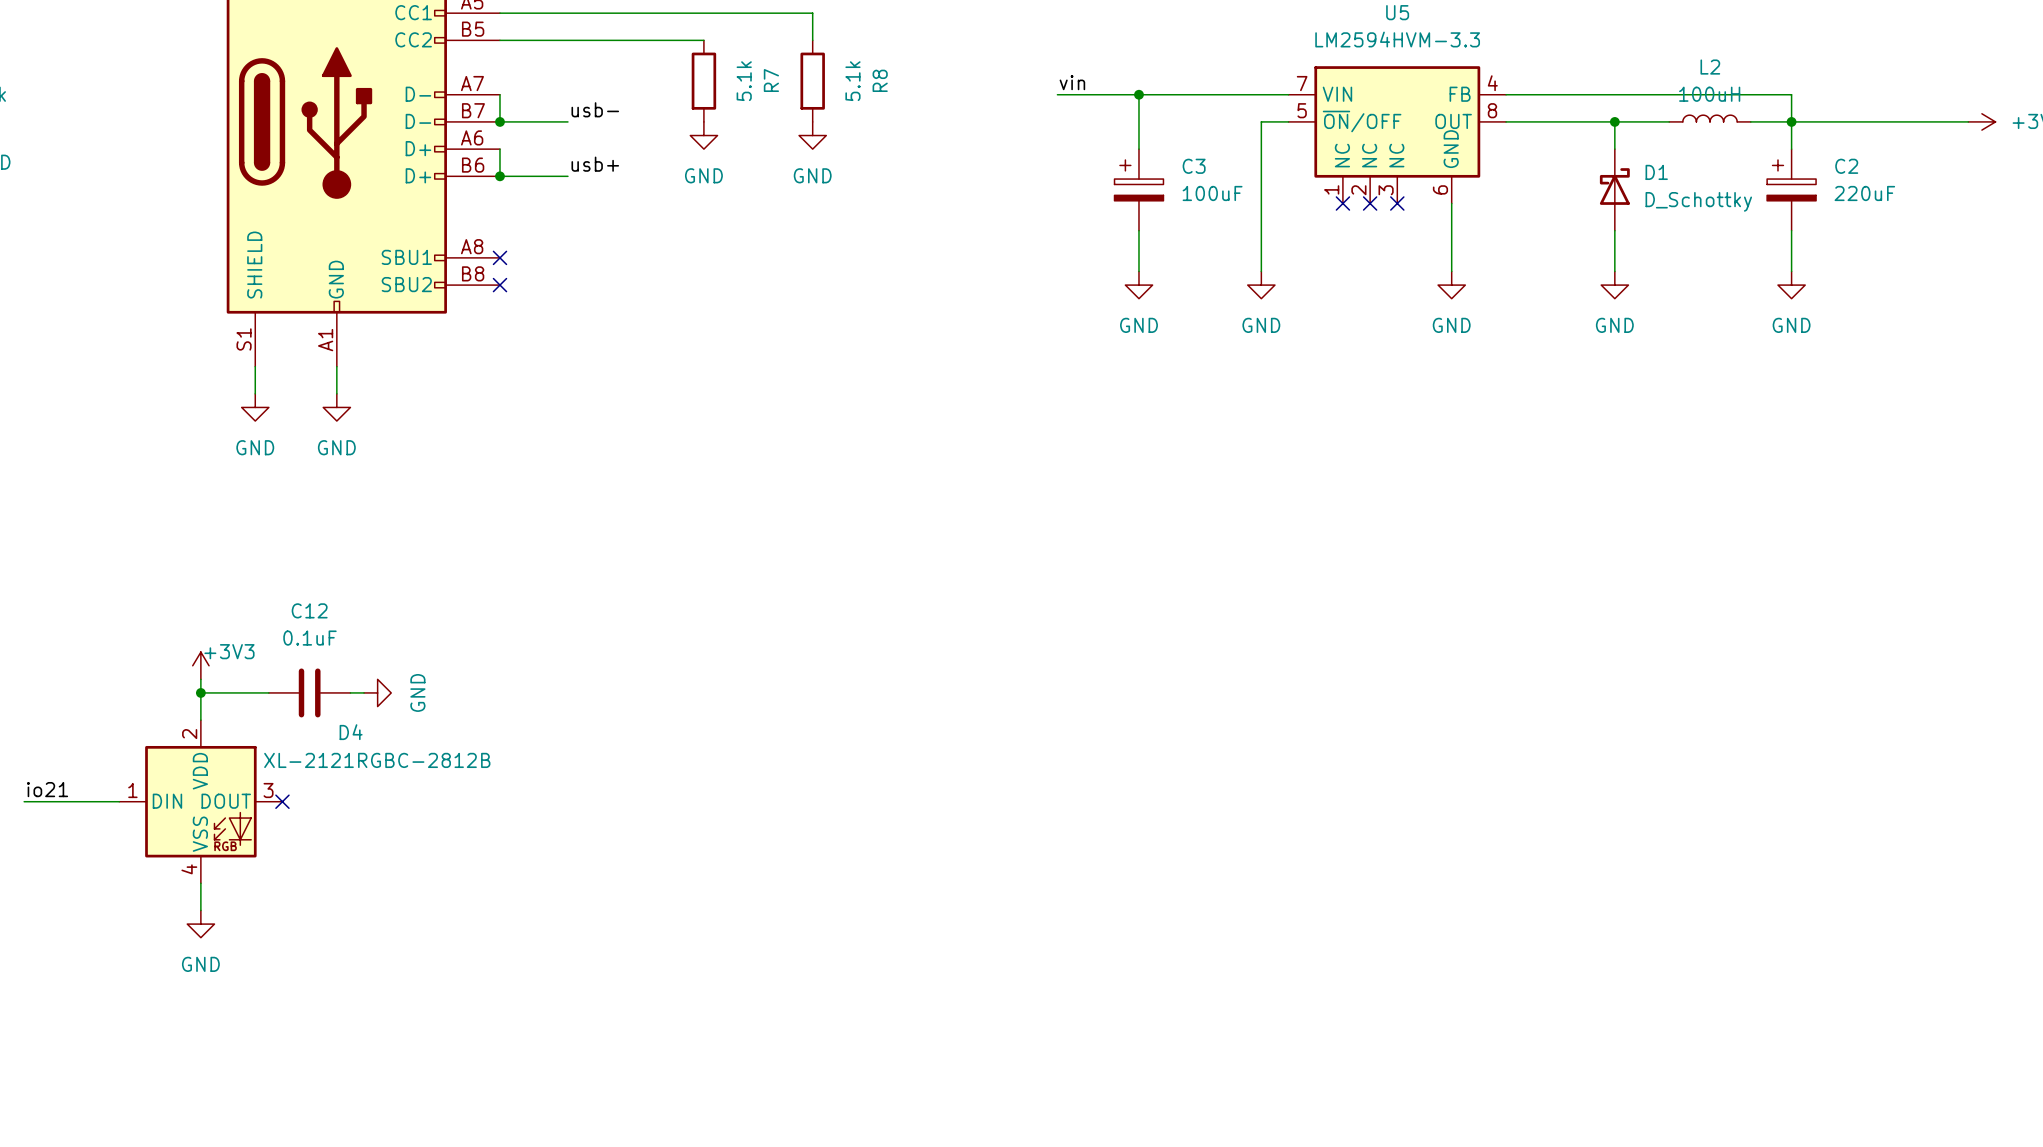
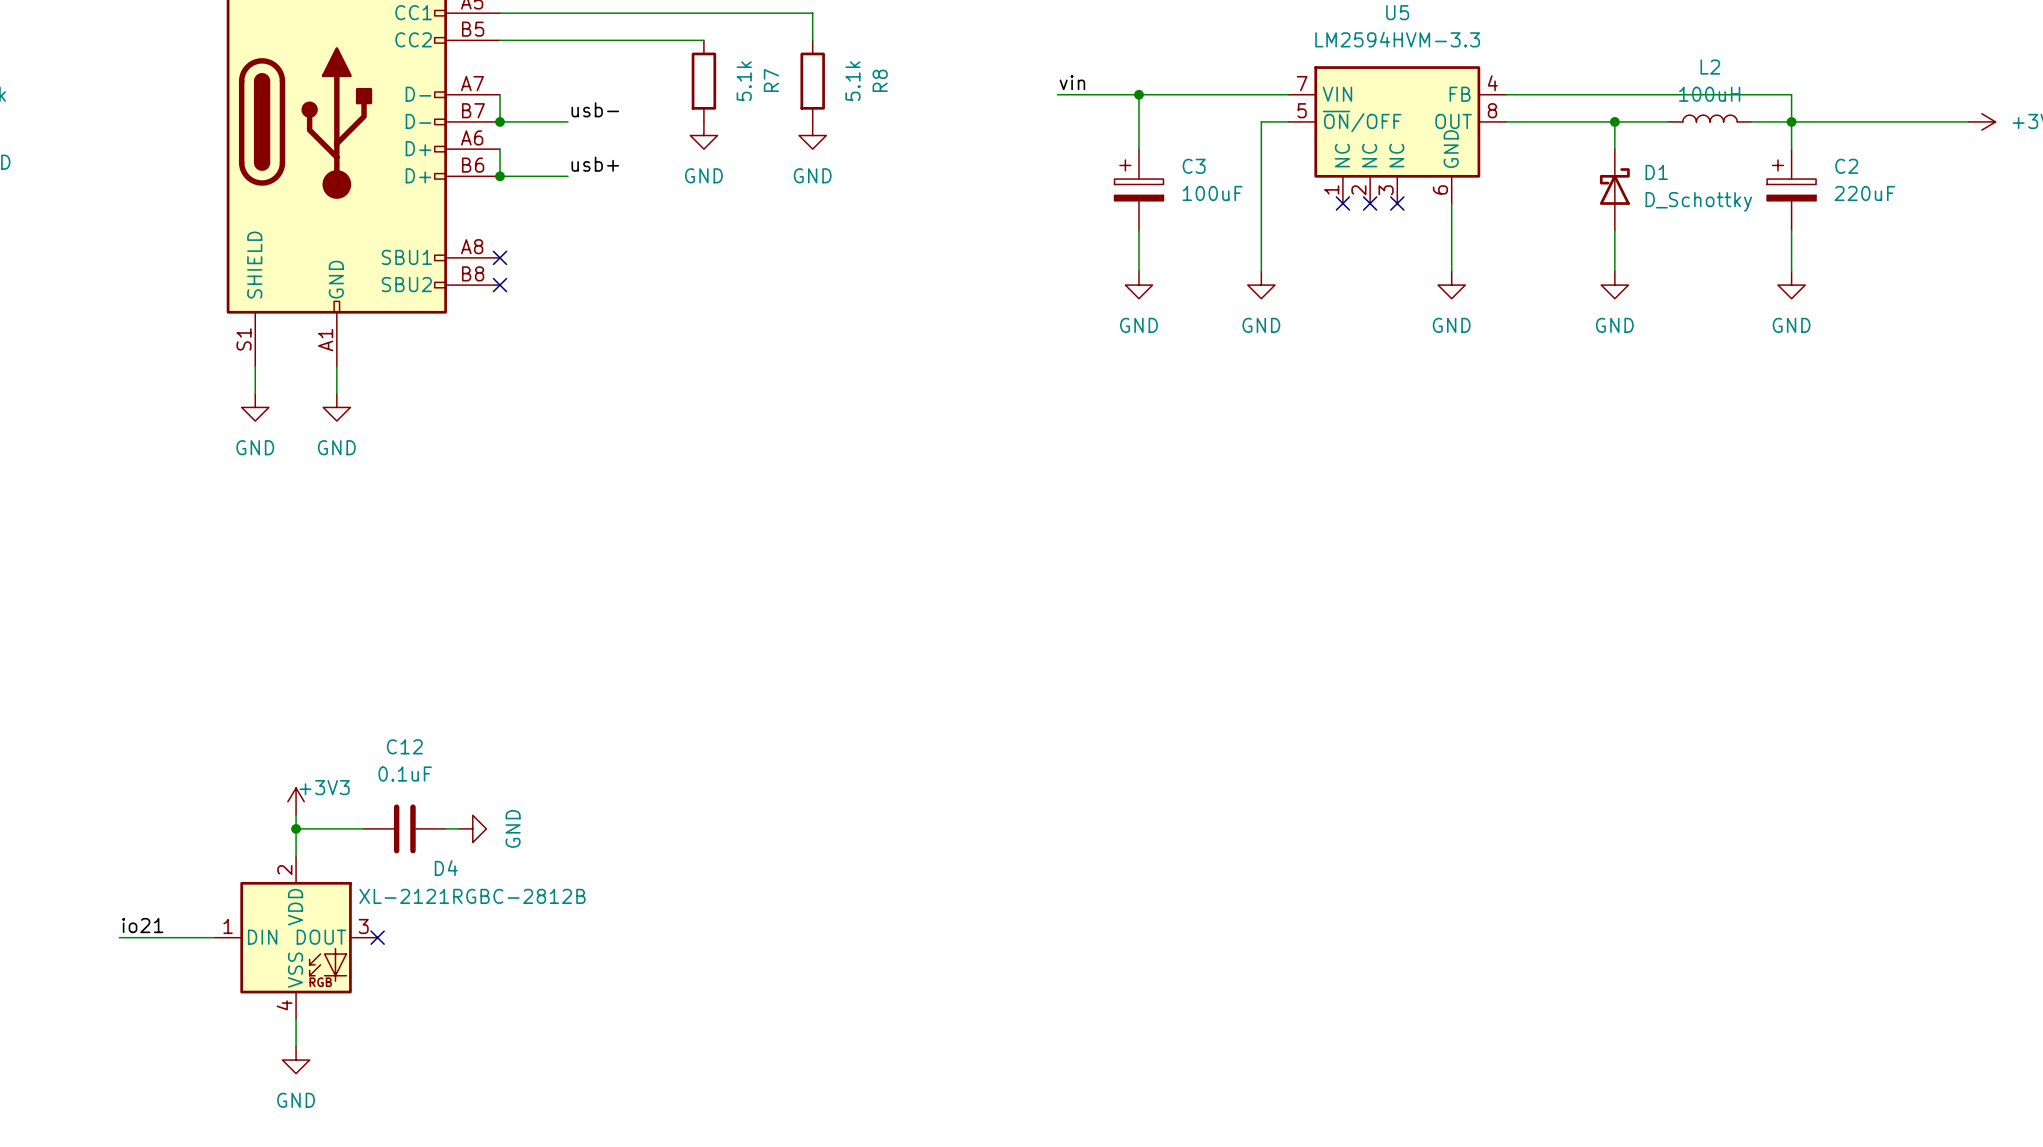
power symbol position: +3V3 (200, 665) -> +3V3 (296, 801)
wire: (200, 679) (200, 720) -> (296, 815) (296, 856)
wire: (200, 692) (268, 692) -> (296, 828) (364, 828)
junction: (200, 692) -> none
C12 position: (309, 692) -> (404, 828)
wire: (350, 692) (364, 692) -> (445, 828) (459, 828)
power symbol: GND (377, 692) -> none
label position: io21 (47, 789) -> io21 (142, 925)
wire: (24, 801) (119, 801) -> (119, 937) (214, 937)
D4 position: (200, 801) -> (296, 937)
no-connect mark: (282, 801) -> none
junction: none -> (296, 828)
power symbol: none -> GND (472, 828)
wire: (200, 883) (200, 910) -> (296, 1019) (296, 1046)
power symbol: GND (200, 924) -> none
no-connect mark: none -> (377, 937)
power symbol: none -> GND (296, 1060)

